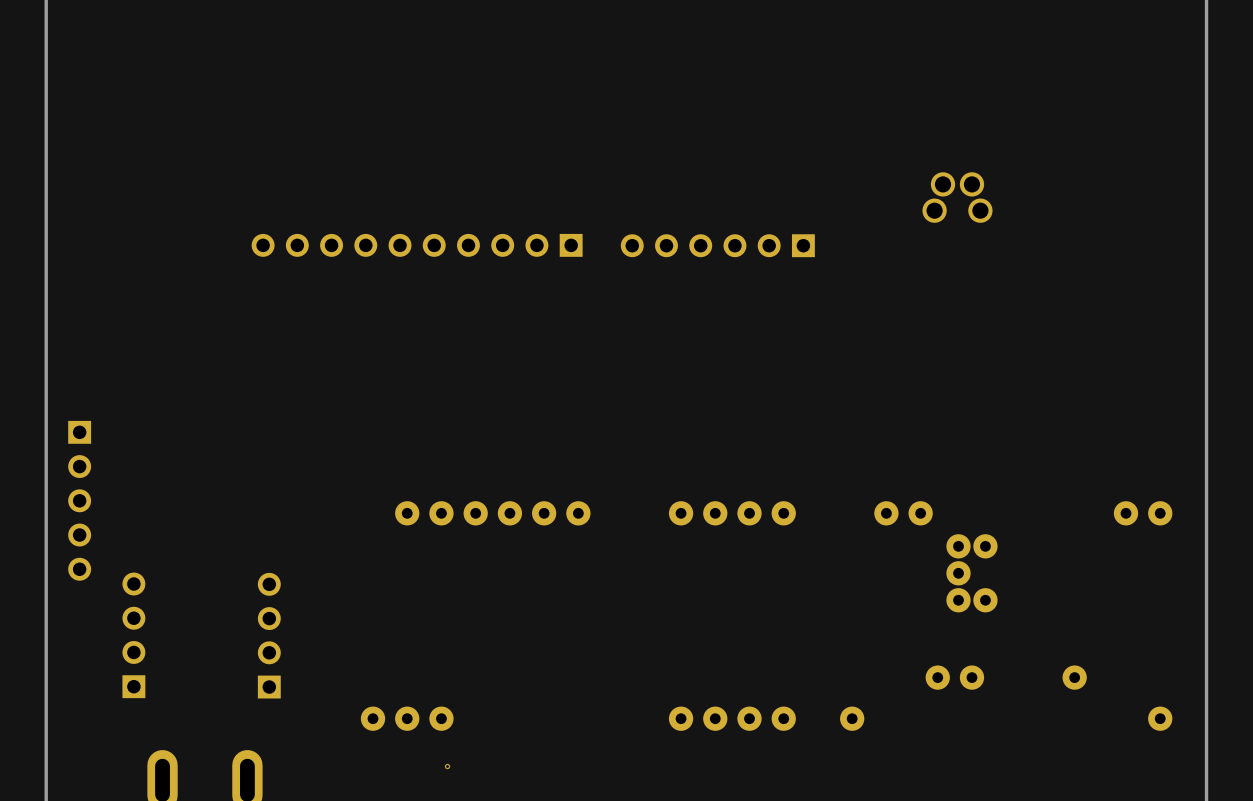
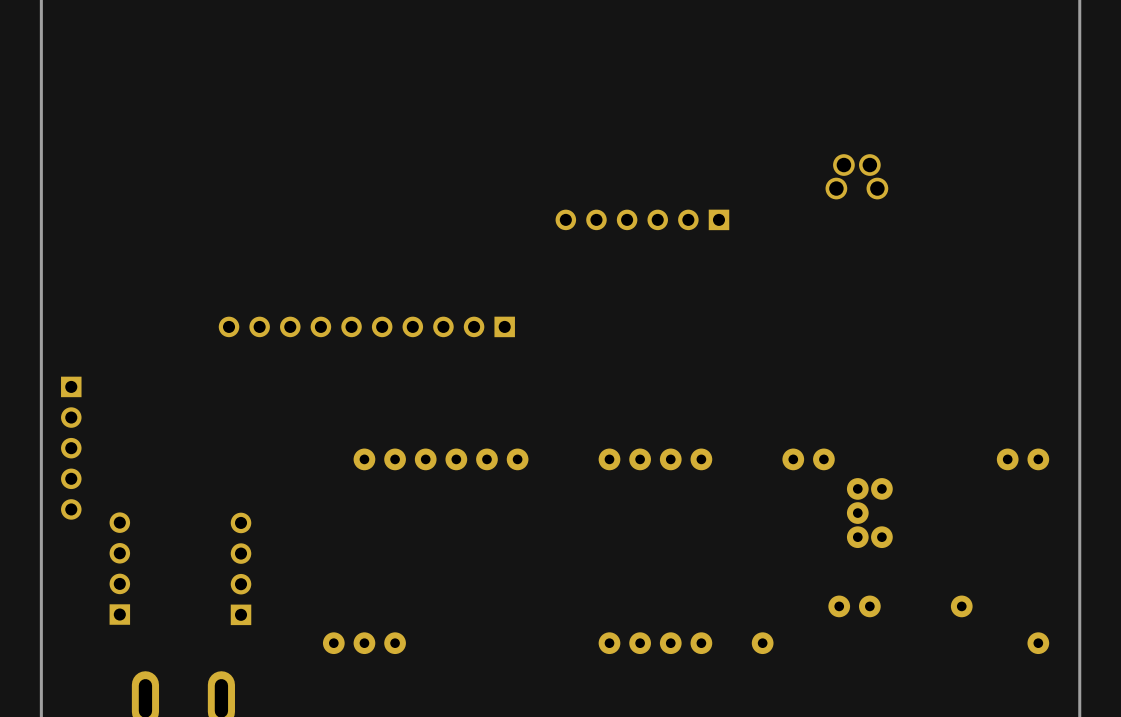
part position: (417, 245) -> (366, 326)
via: (447, 766) -> none

